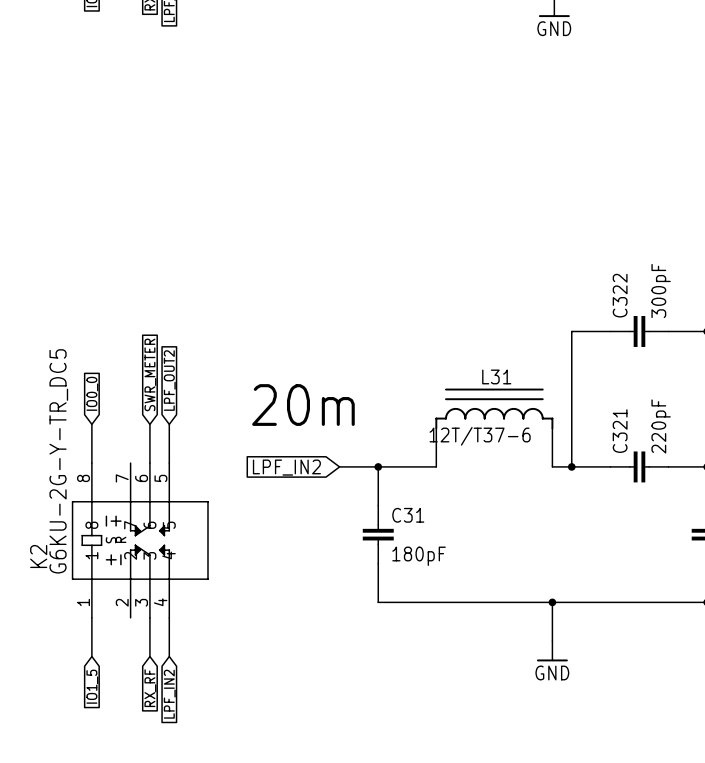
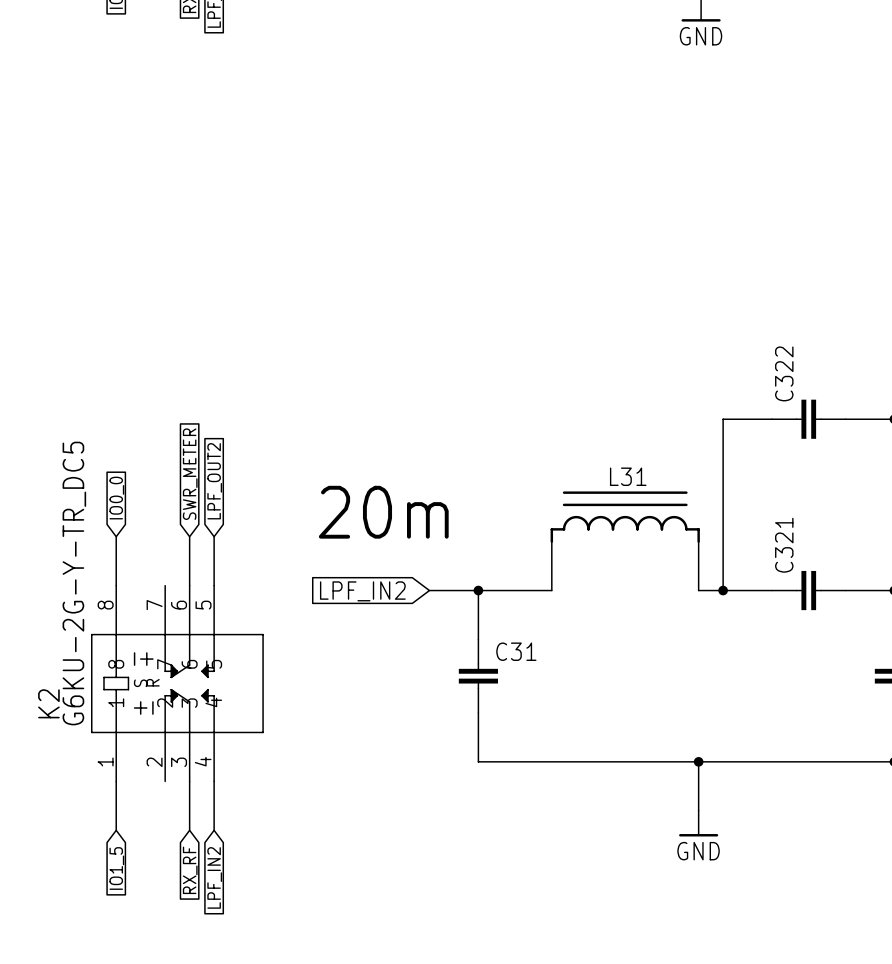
C322 value: 300pF (661, 291) -> none
C321 value: 220pF (661, 426) -> none
L31 value: 12T/T37-6 (480, 436) -> none
C31 value: 180pF (419, 556) -> none

